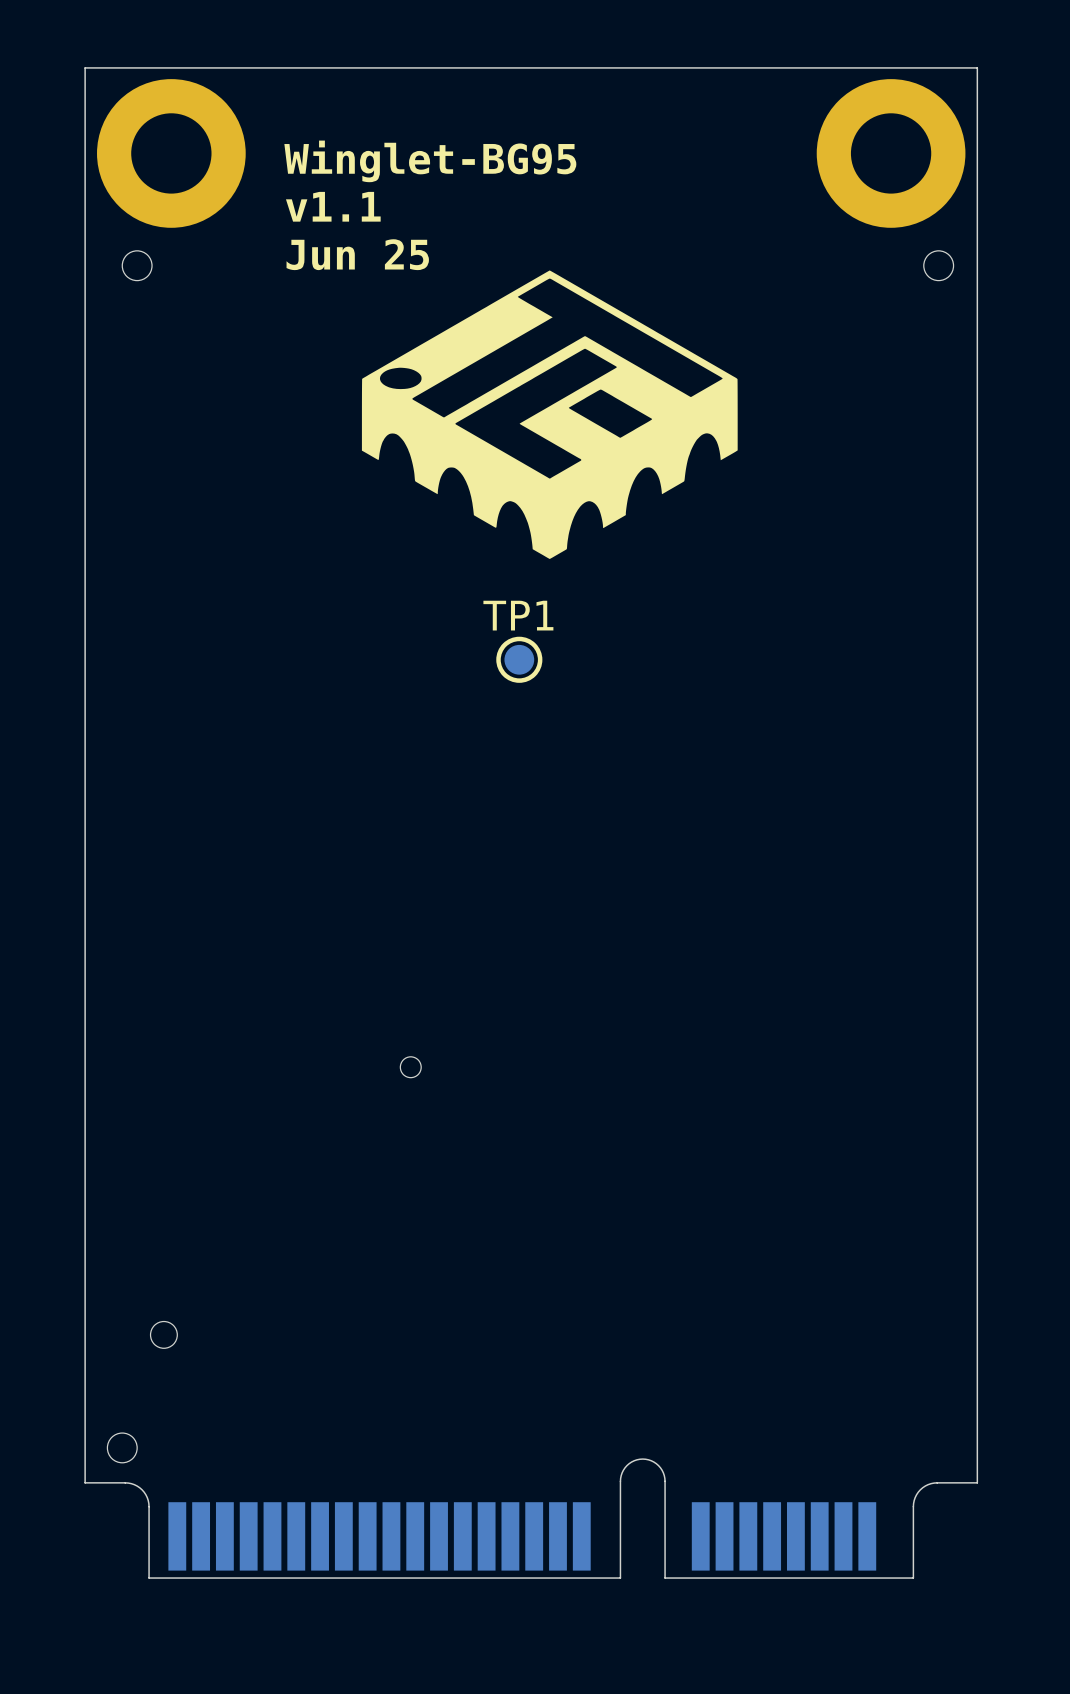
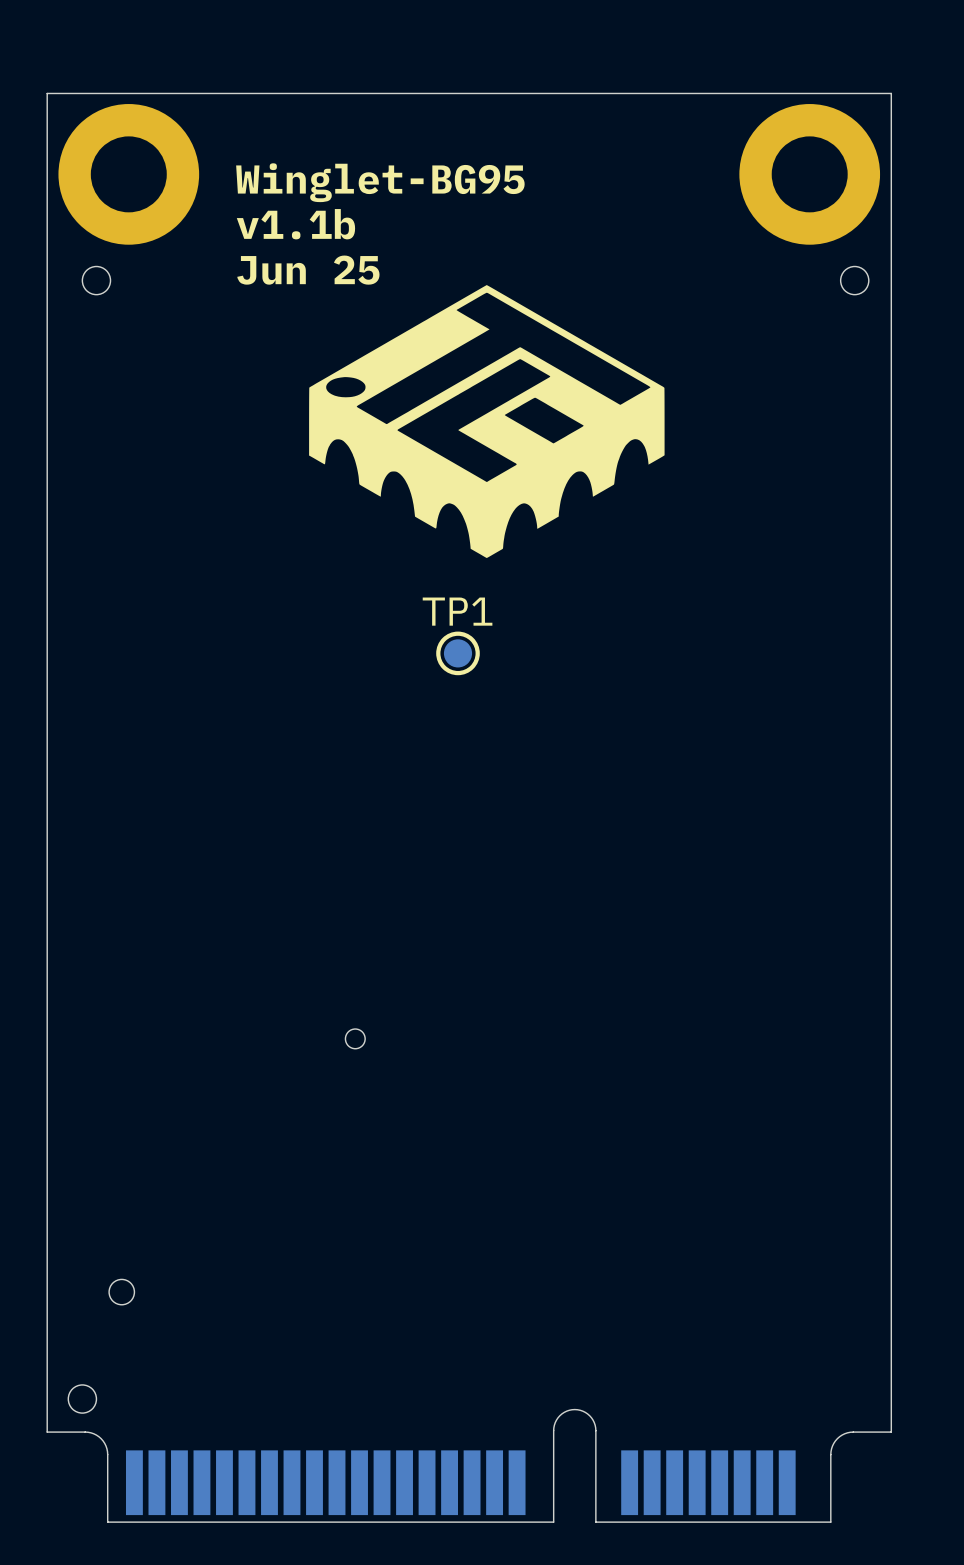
text: v1.1 (333, 206) -> v1.1b (295, 224)

